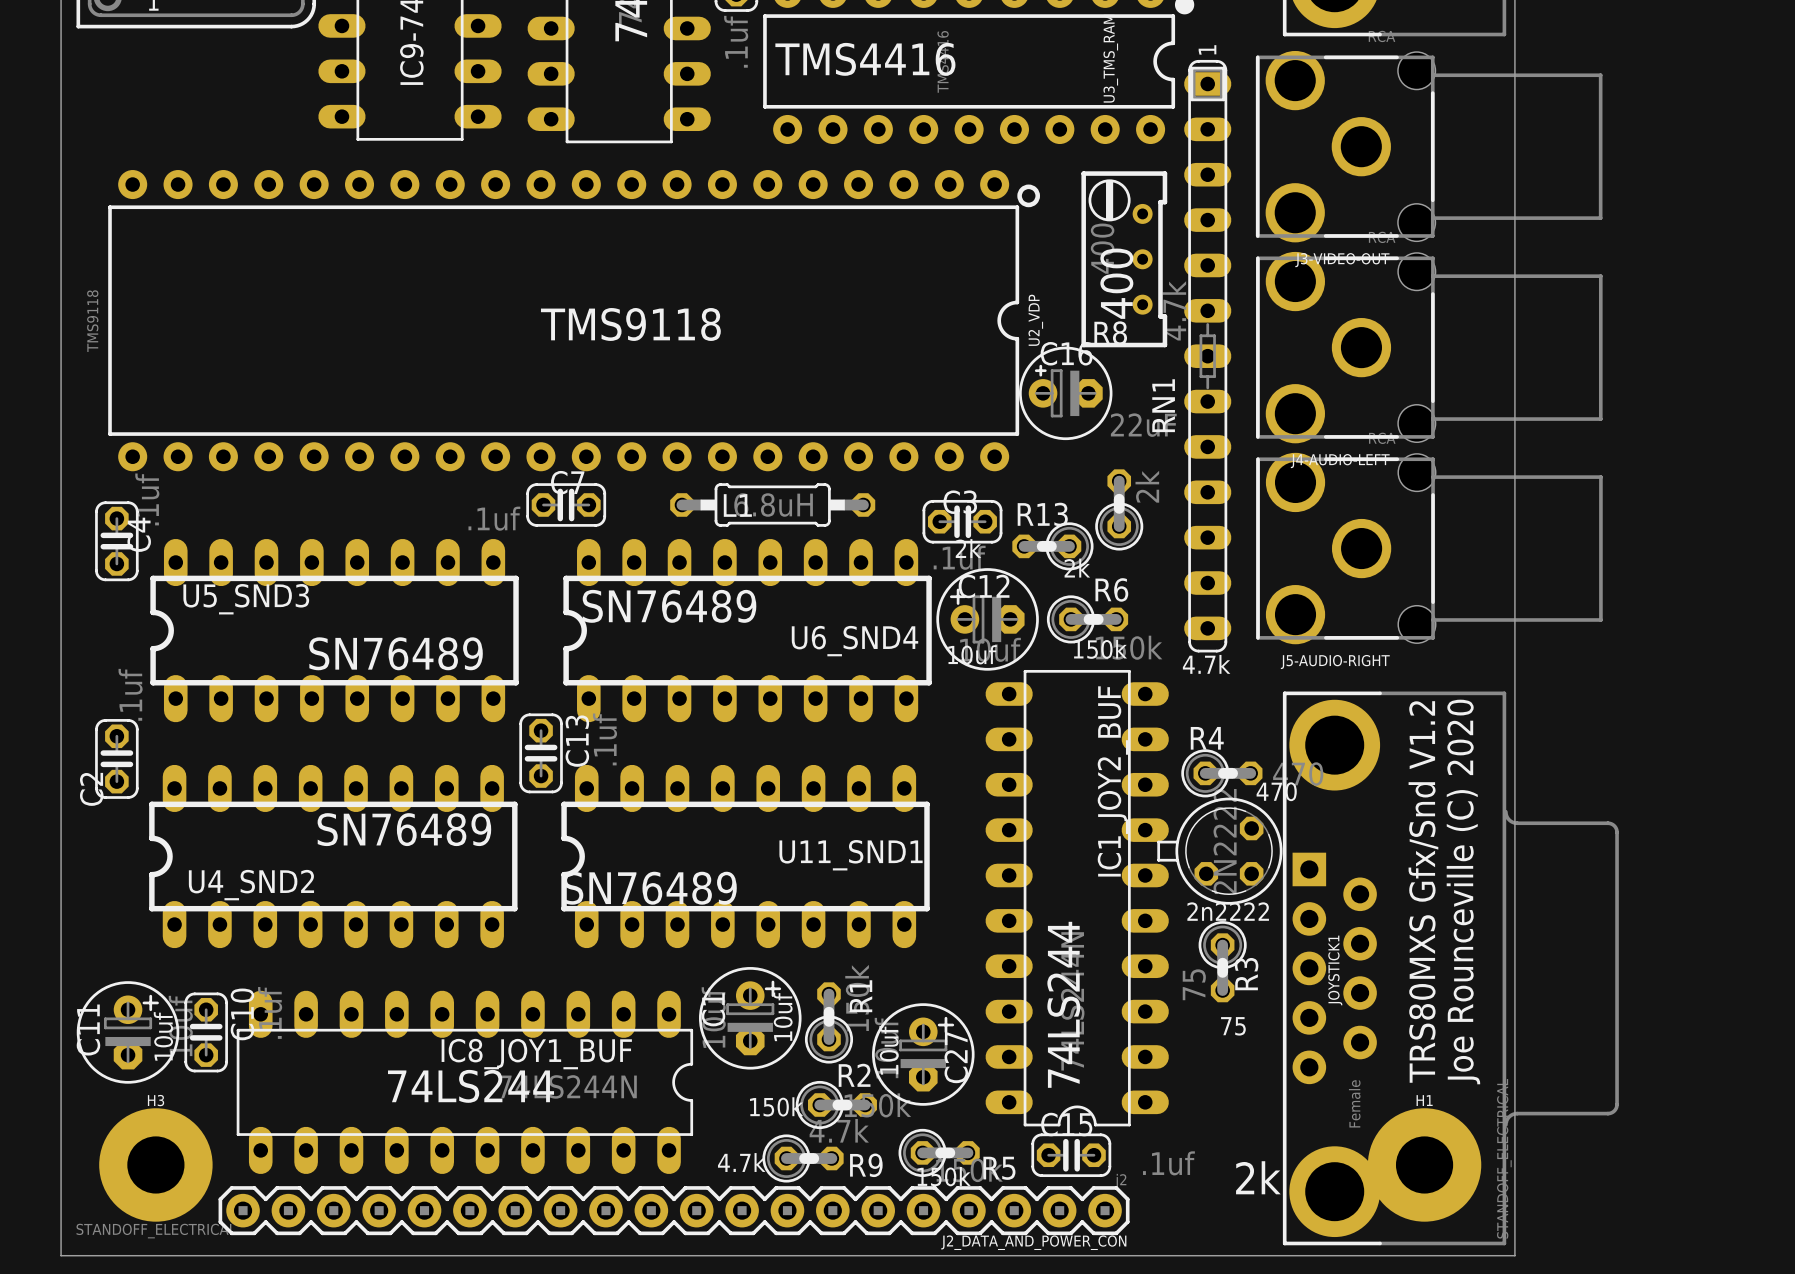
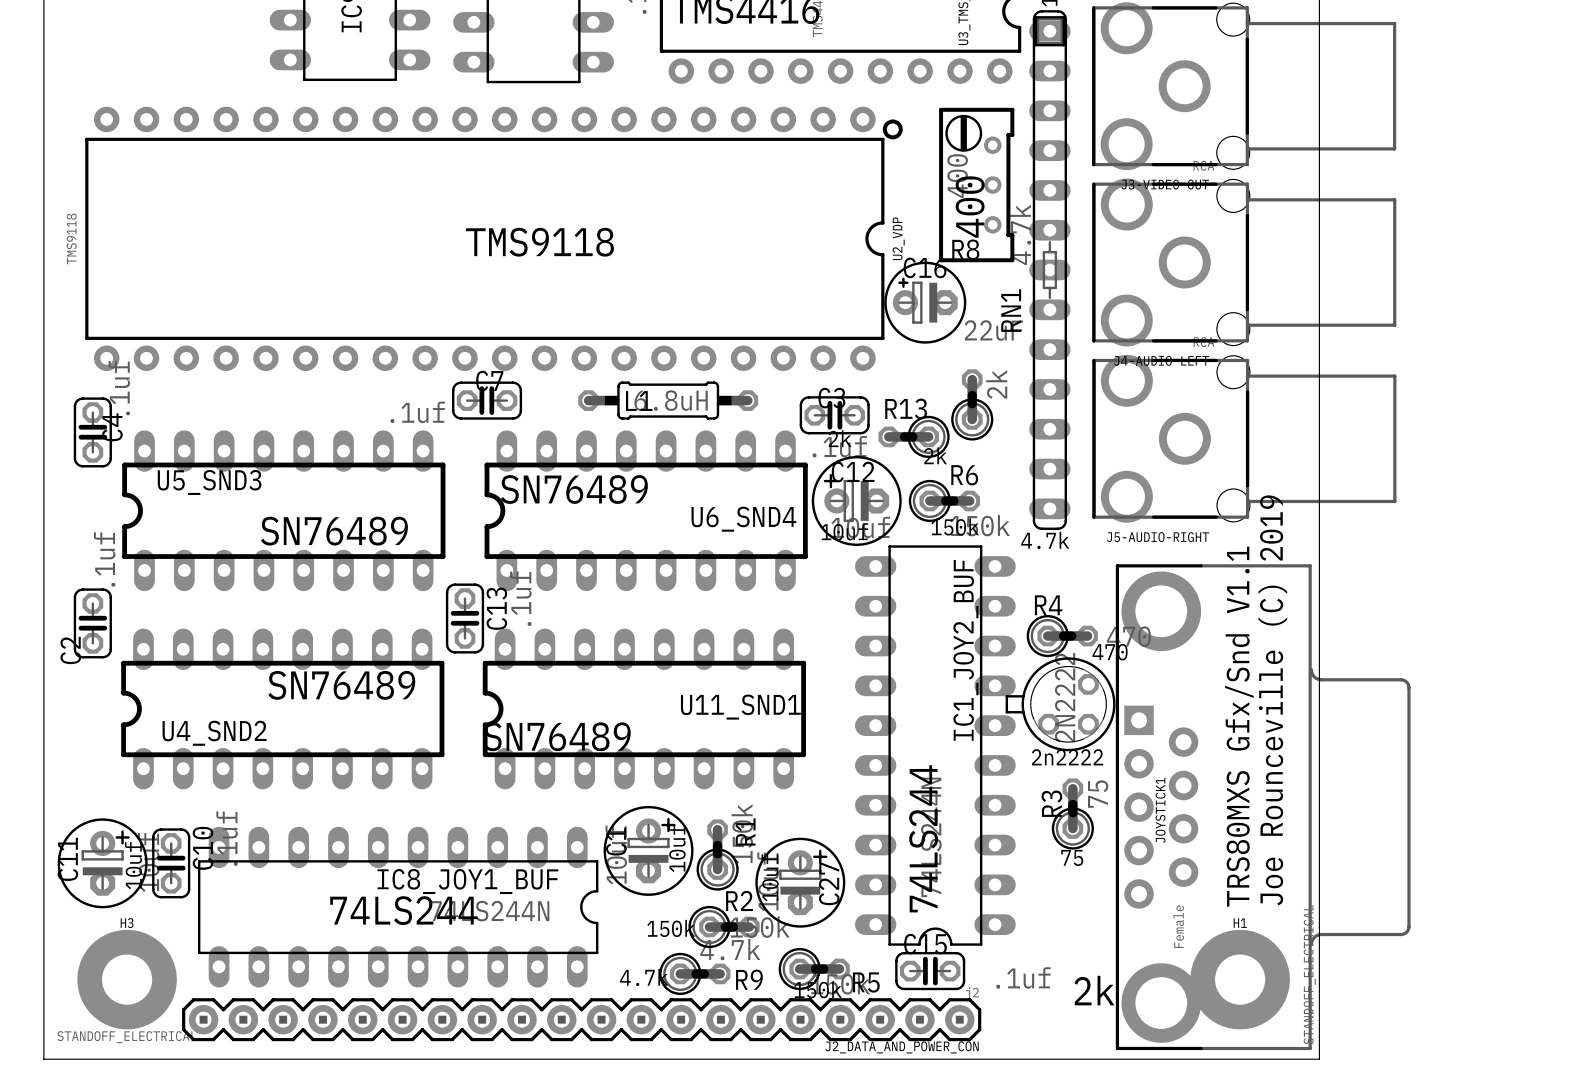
text: TRS80MXS Gfx/Snd V1.2 (1423, 891) -> TRS80MXS Gfx/Snd V1.1 (1239, 726)
text: Joe Rounceville (C) 2020 (1463, 891) -> Joe Rounceville (C) 2019 (1272, 700)
R3 rotation: 0° (1222, 961) -> 180° (1072, 814)

